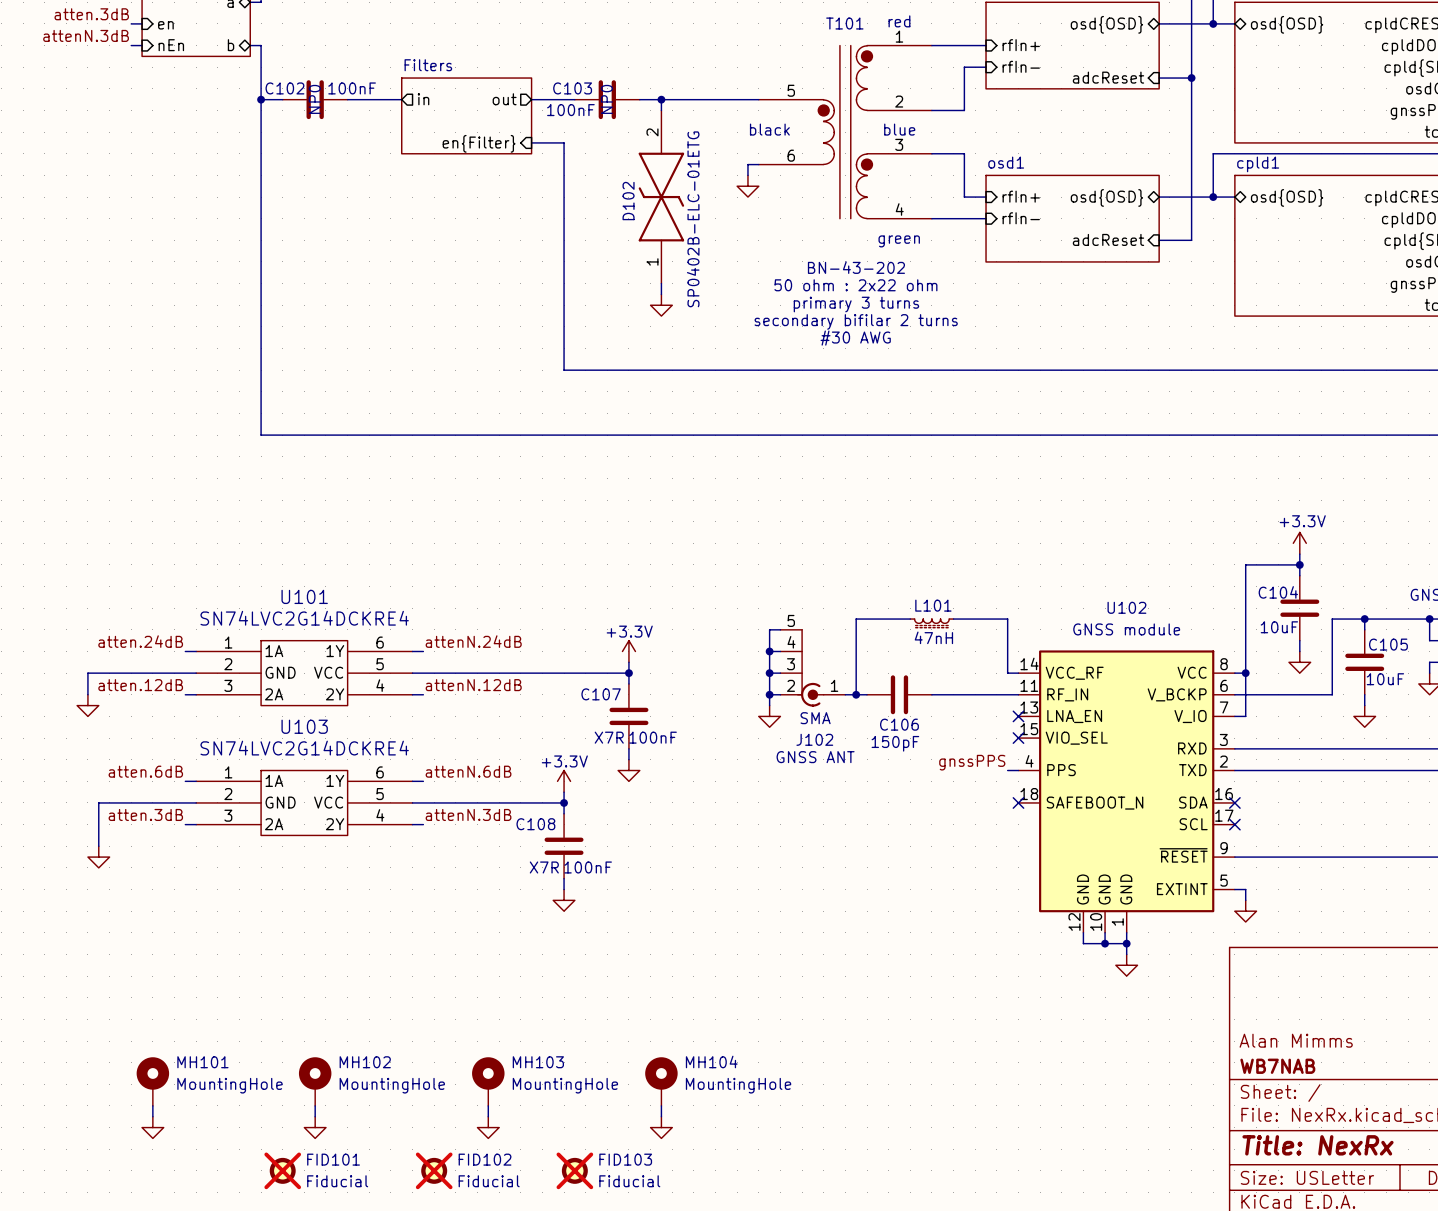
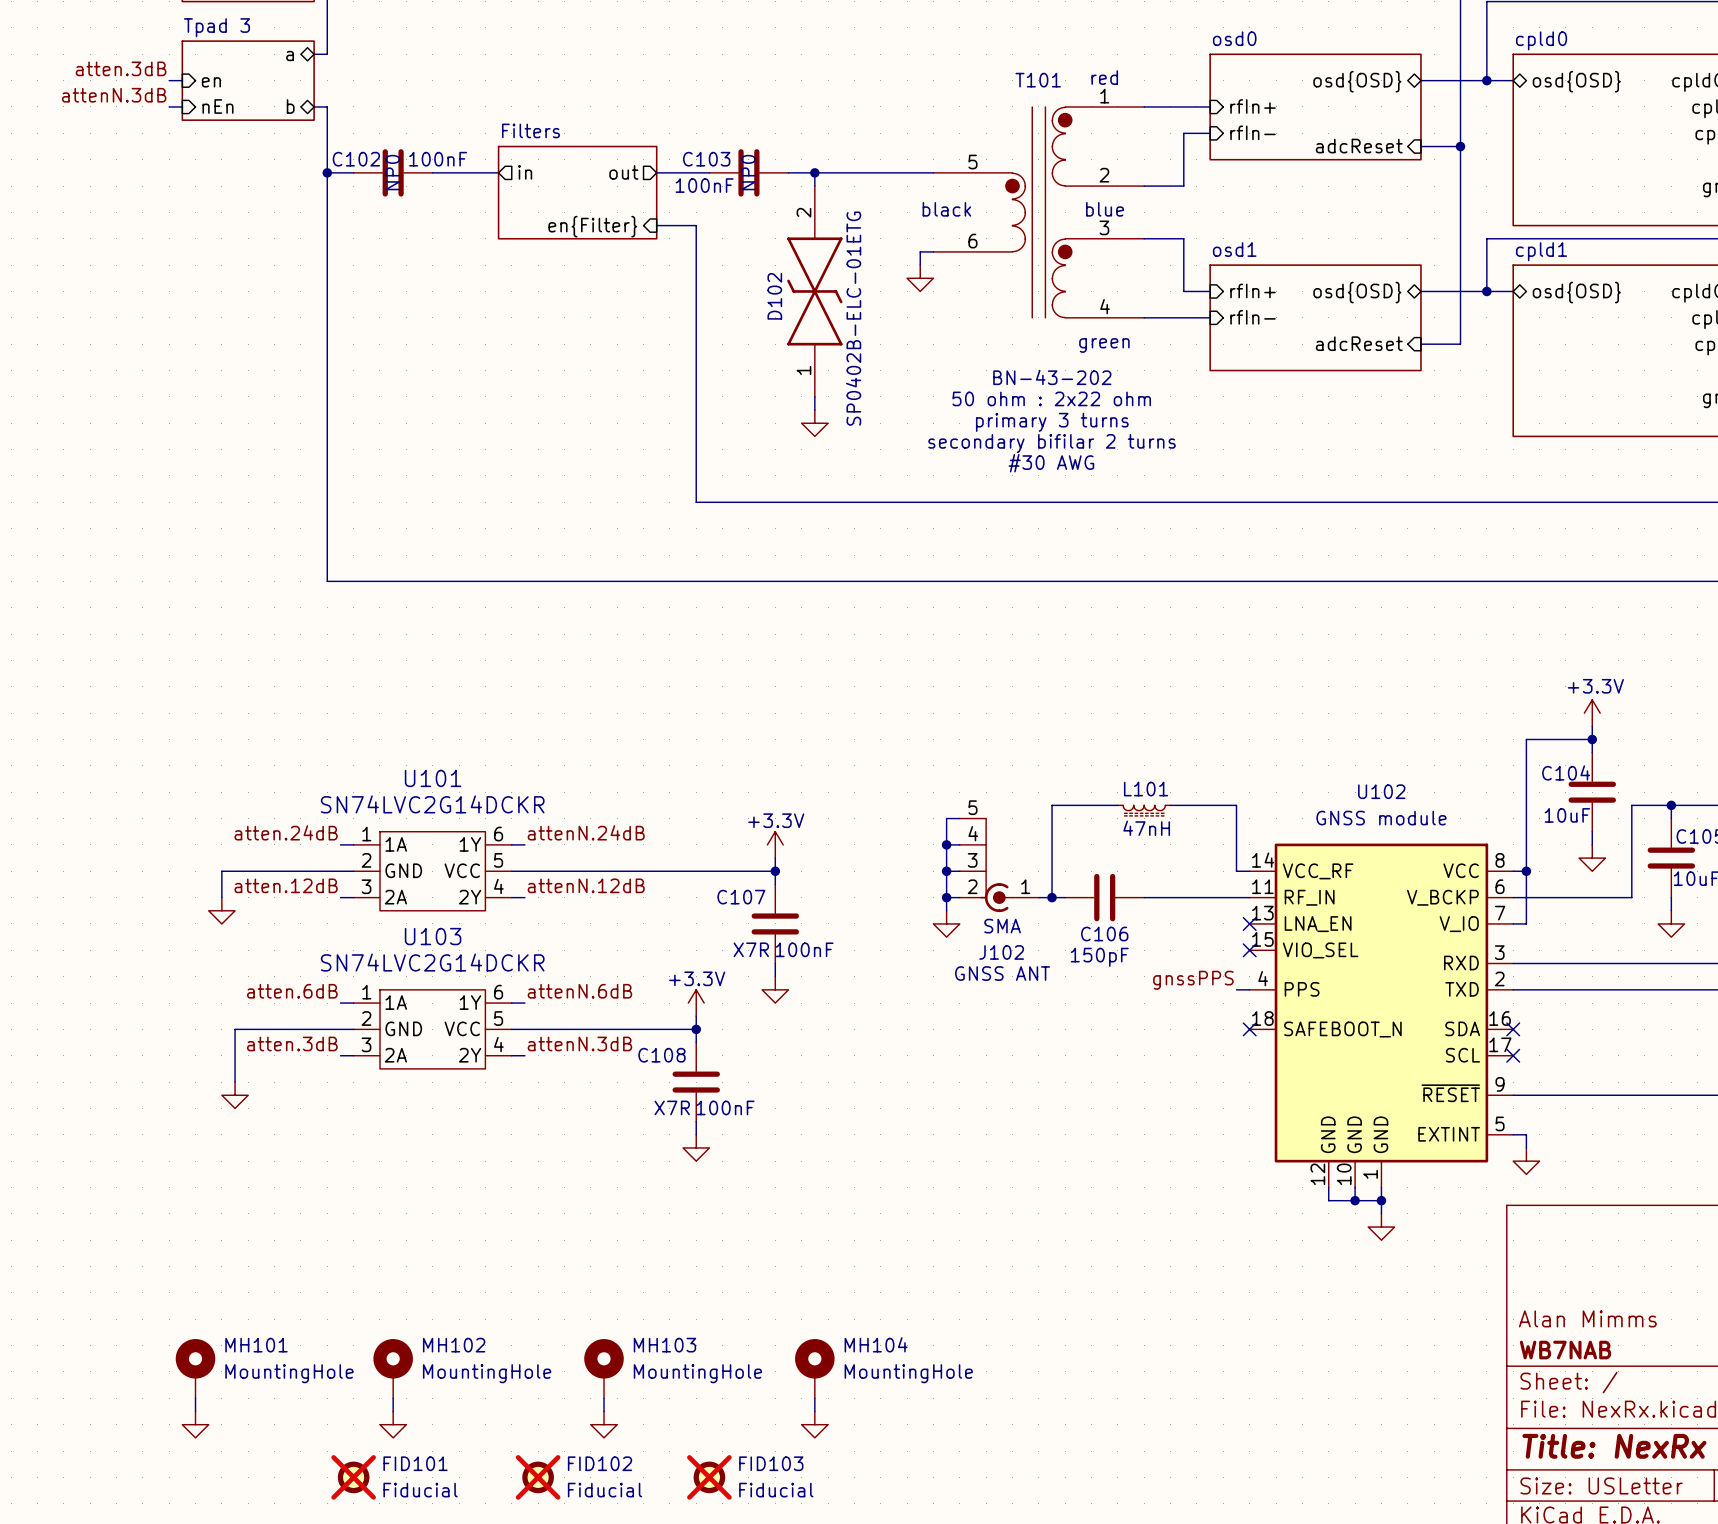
U101 value: SN74LVC2G14DCKRE4 (304, 618) -> SN74LVC2G14DCKR (432, 804)
U101 symbol: [196, 640, 413, 706] -> [353, 831, 512, 911]
label position: atten.24dB (140, 641) -> atten.24dB (286, 832)
wire: (185, 651) (196, 651) -> (340, 844) (353, 844)
wire: (174, 673) (87, 673) (87, 694) -> (221, 871) (221, 897)
label position: atten.12dB (140, 685) -> atten.12dB (286, 885)
wire: (185, 694) (196, 694) -> (340, 897) (353, 897)
power symbol: (87, 705) -> none
power symbol: none -> (221, 910)
U103 value: SN74LVC2G14DCKRE4 (304, 748) -> SN74LVC2G14DCKR (432, 962)
U103 symbol: [196, 770, 413, 836] -> [353, 989, 512, 1069]
label position: atten.6dB (145, 771) -> atten.6dB (292, 991)
wire: (185, 781) (196, 781) -> (340, 1003) (353, 1003)
wire: (185, 802) (98, 802) (98, 846) -> (235, 1029) (235, 1082)
label position: atten.3dB (145, 814) -> atten.3dB (292, 1043)
wire: (185, 824) (196, 824) -> (340, 1055) (353, 1055)
power symbol: (98, 857) -> none
power symbol: none -> (235, 1095)

